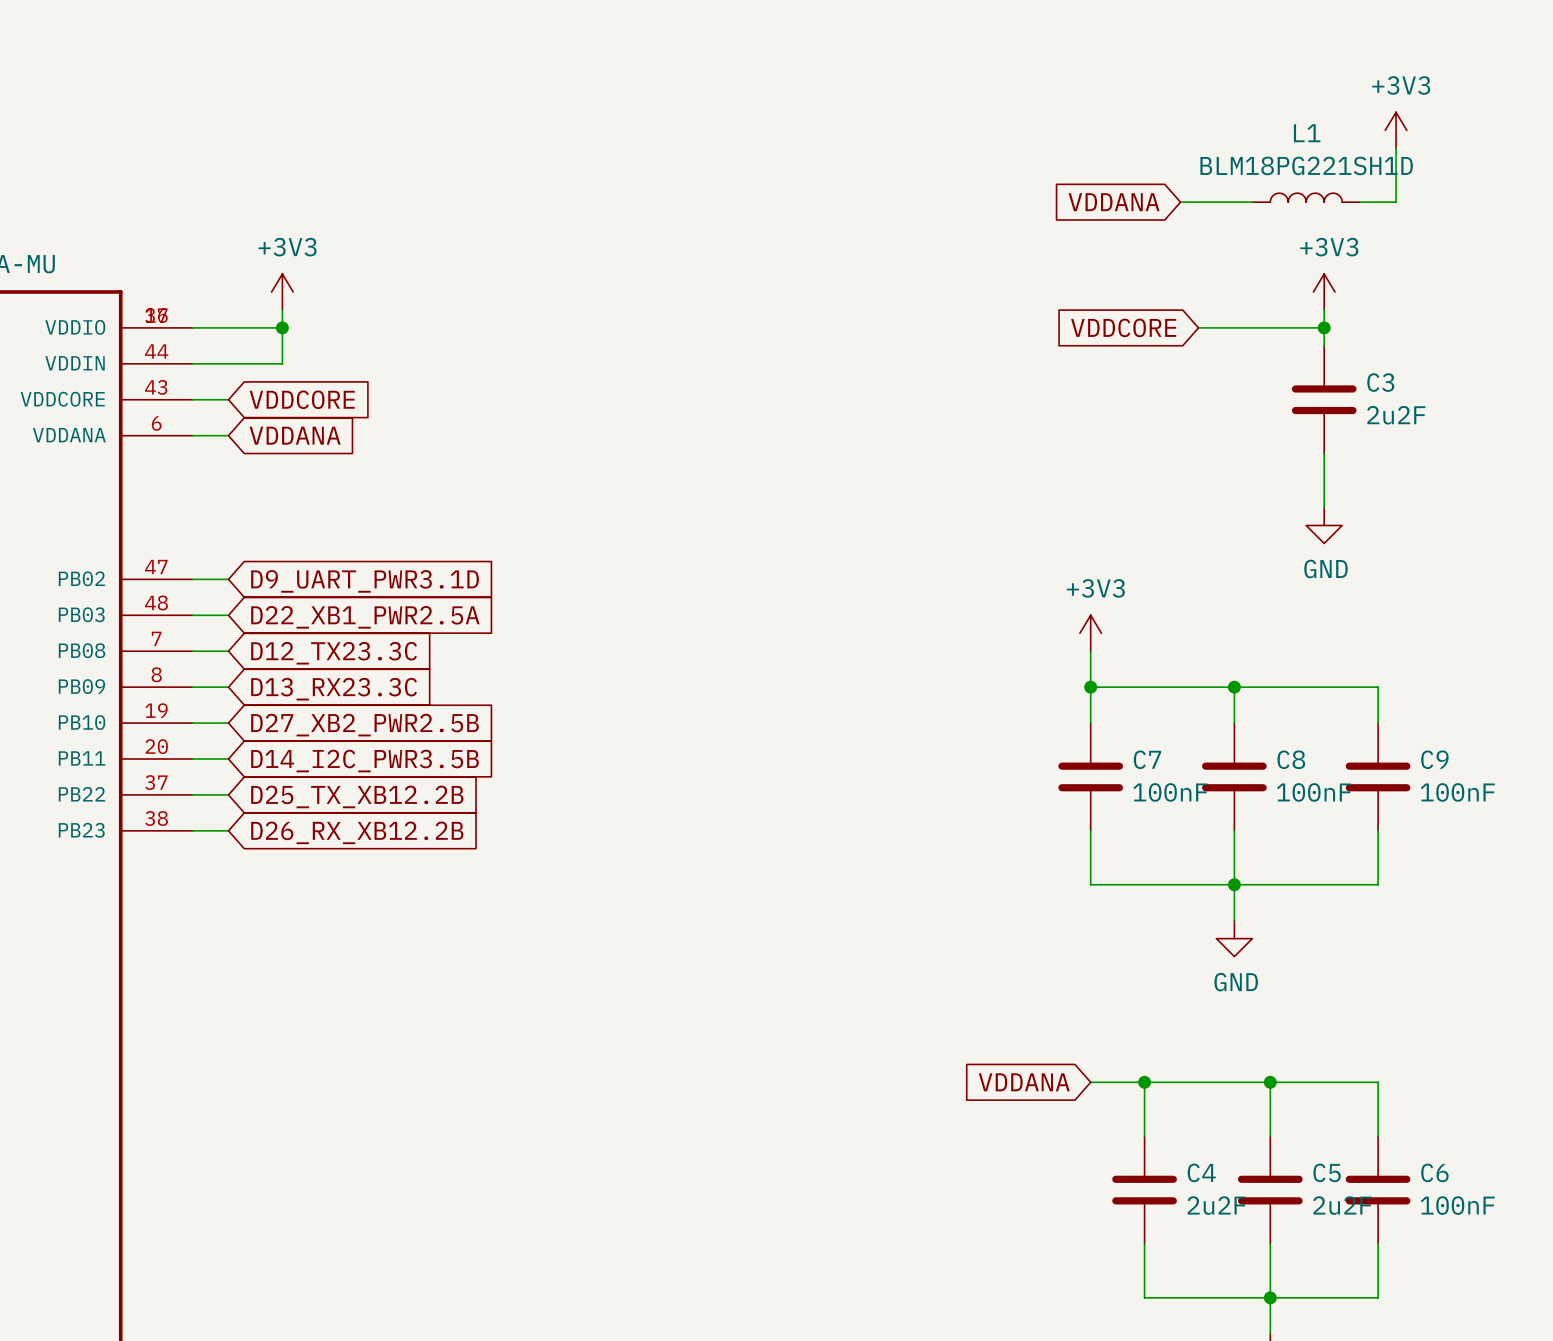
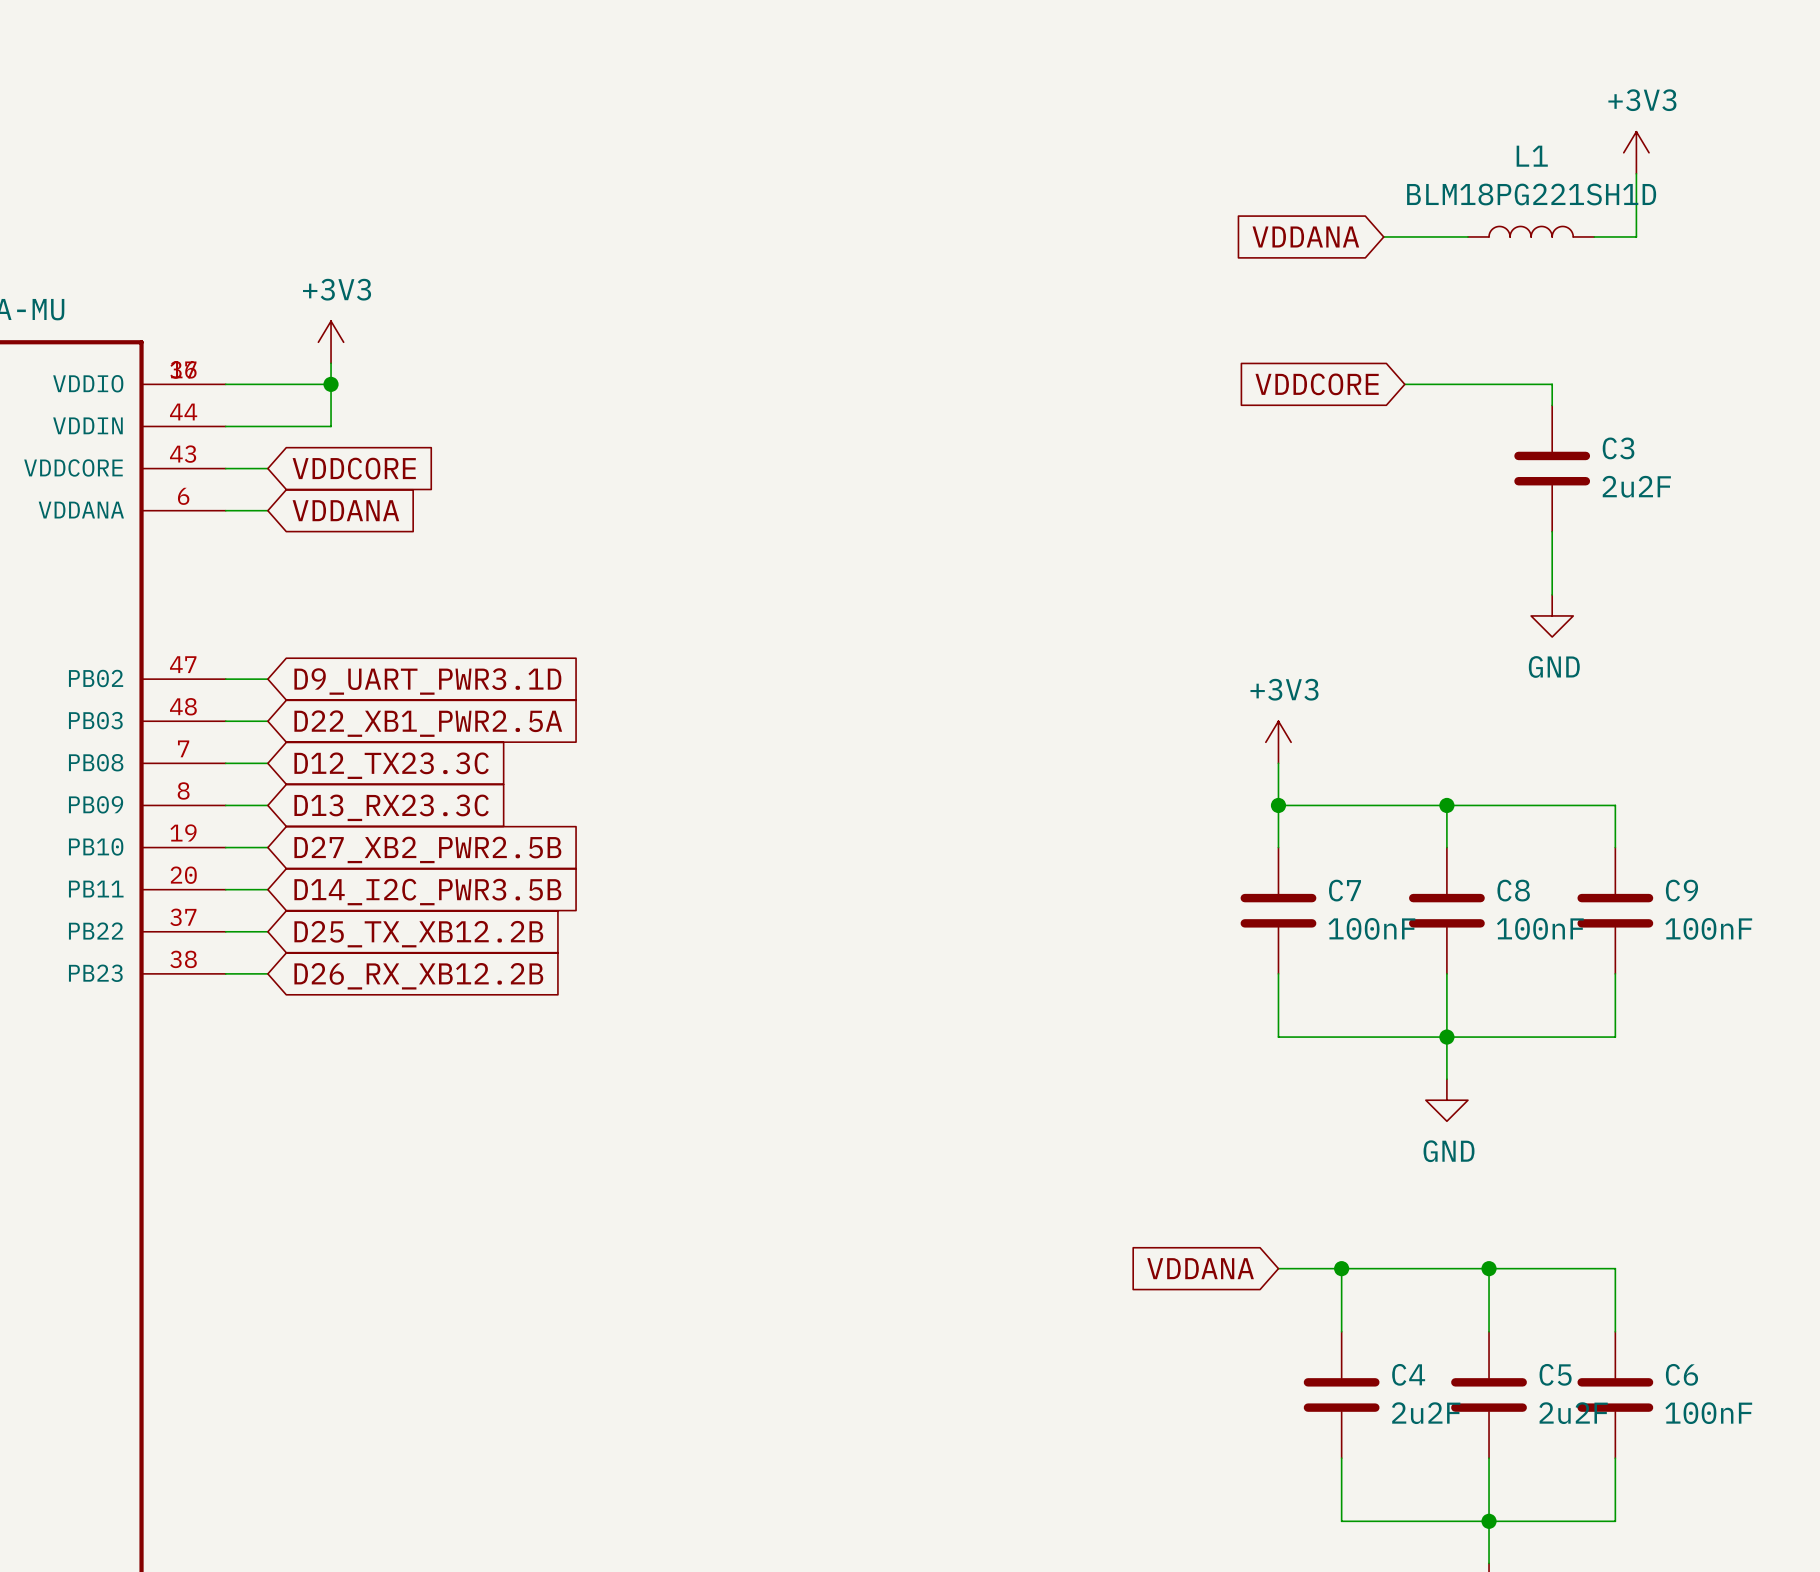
power symbol: +3V3 (1324, 291) -> none
wire: (1324, 309) (1324, 327) -> none
junction: (1324, 327) -> none

